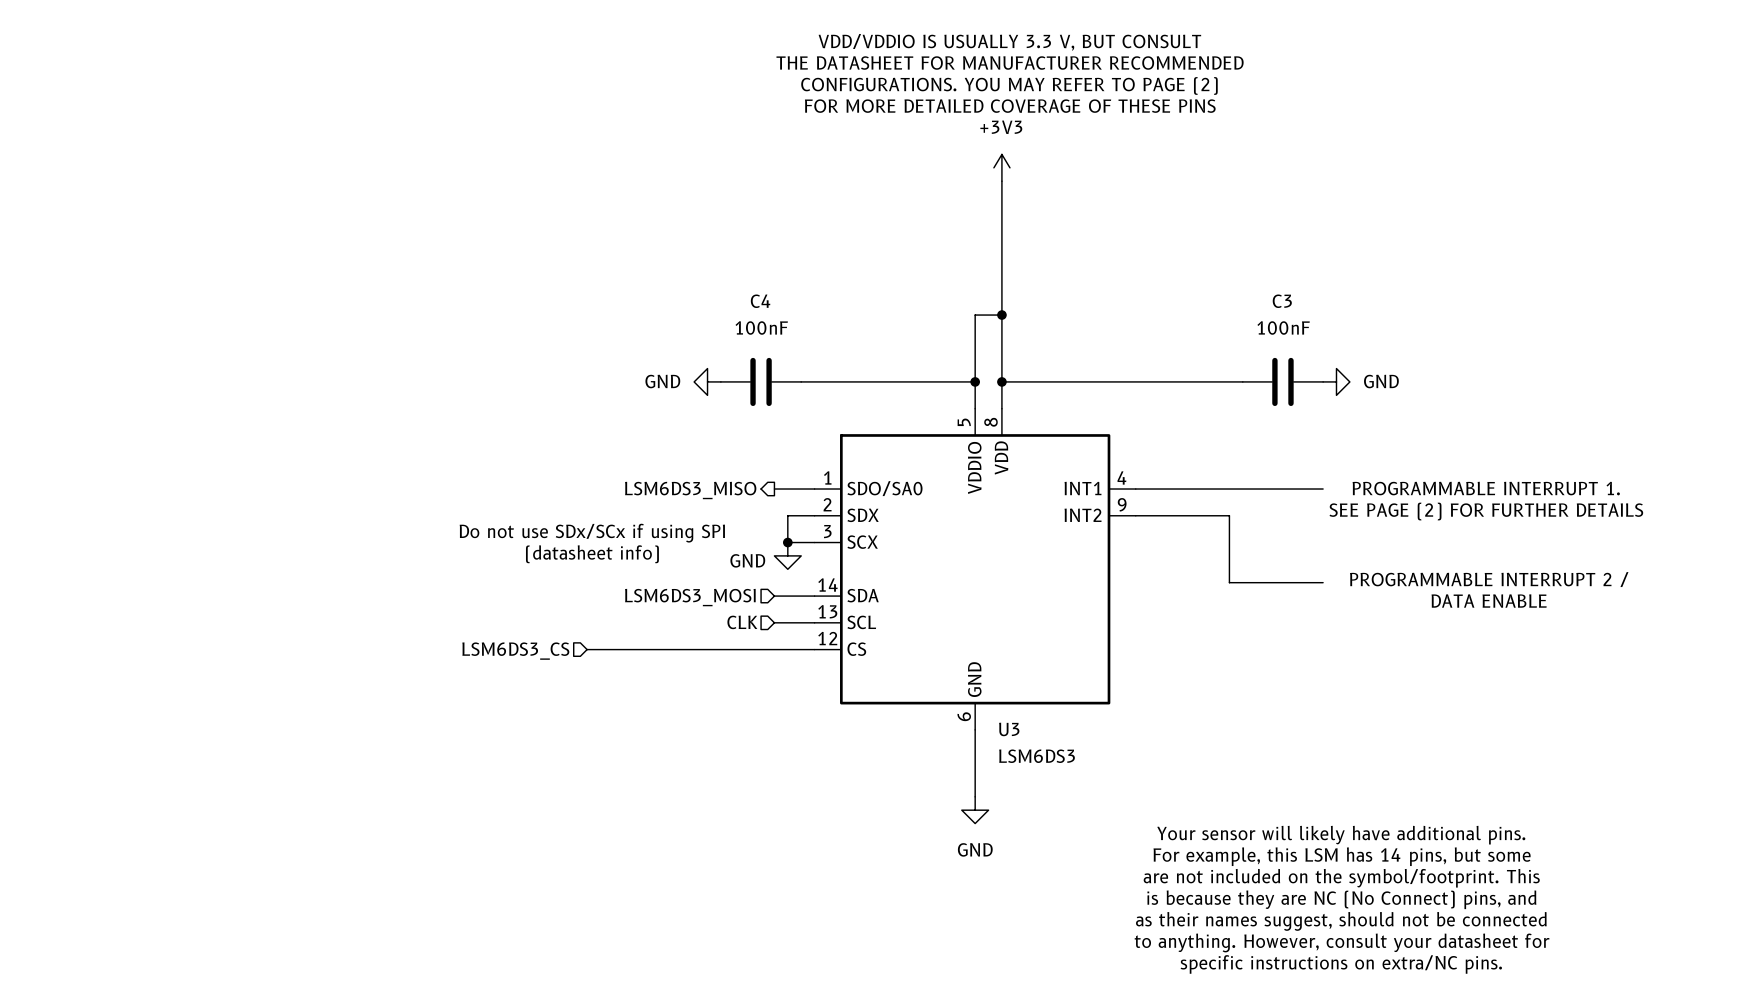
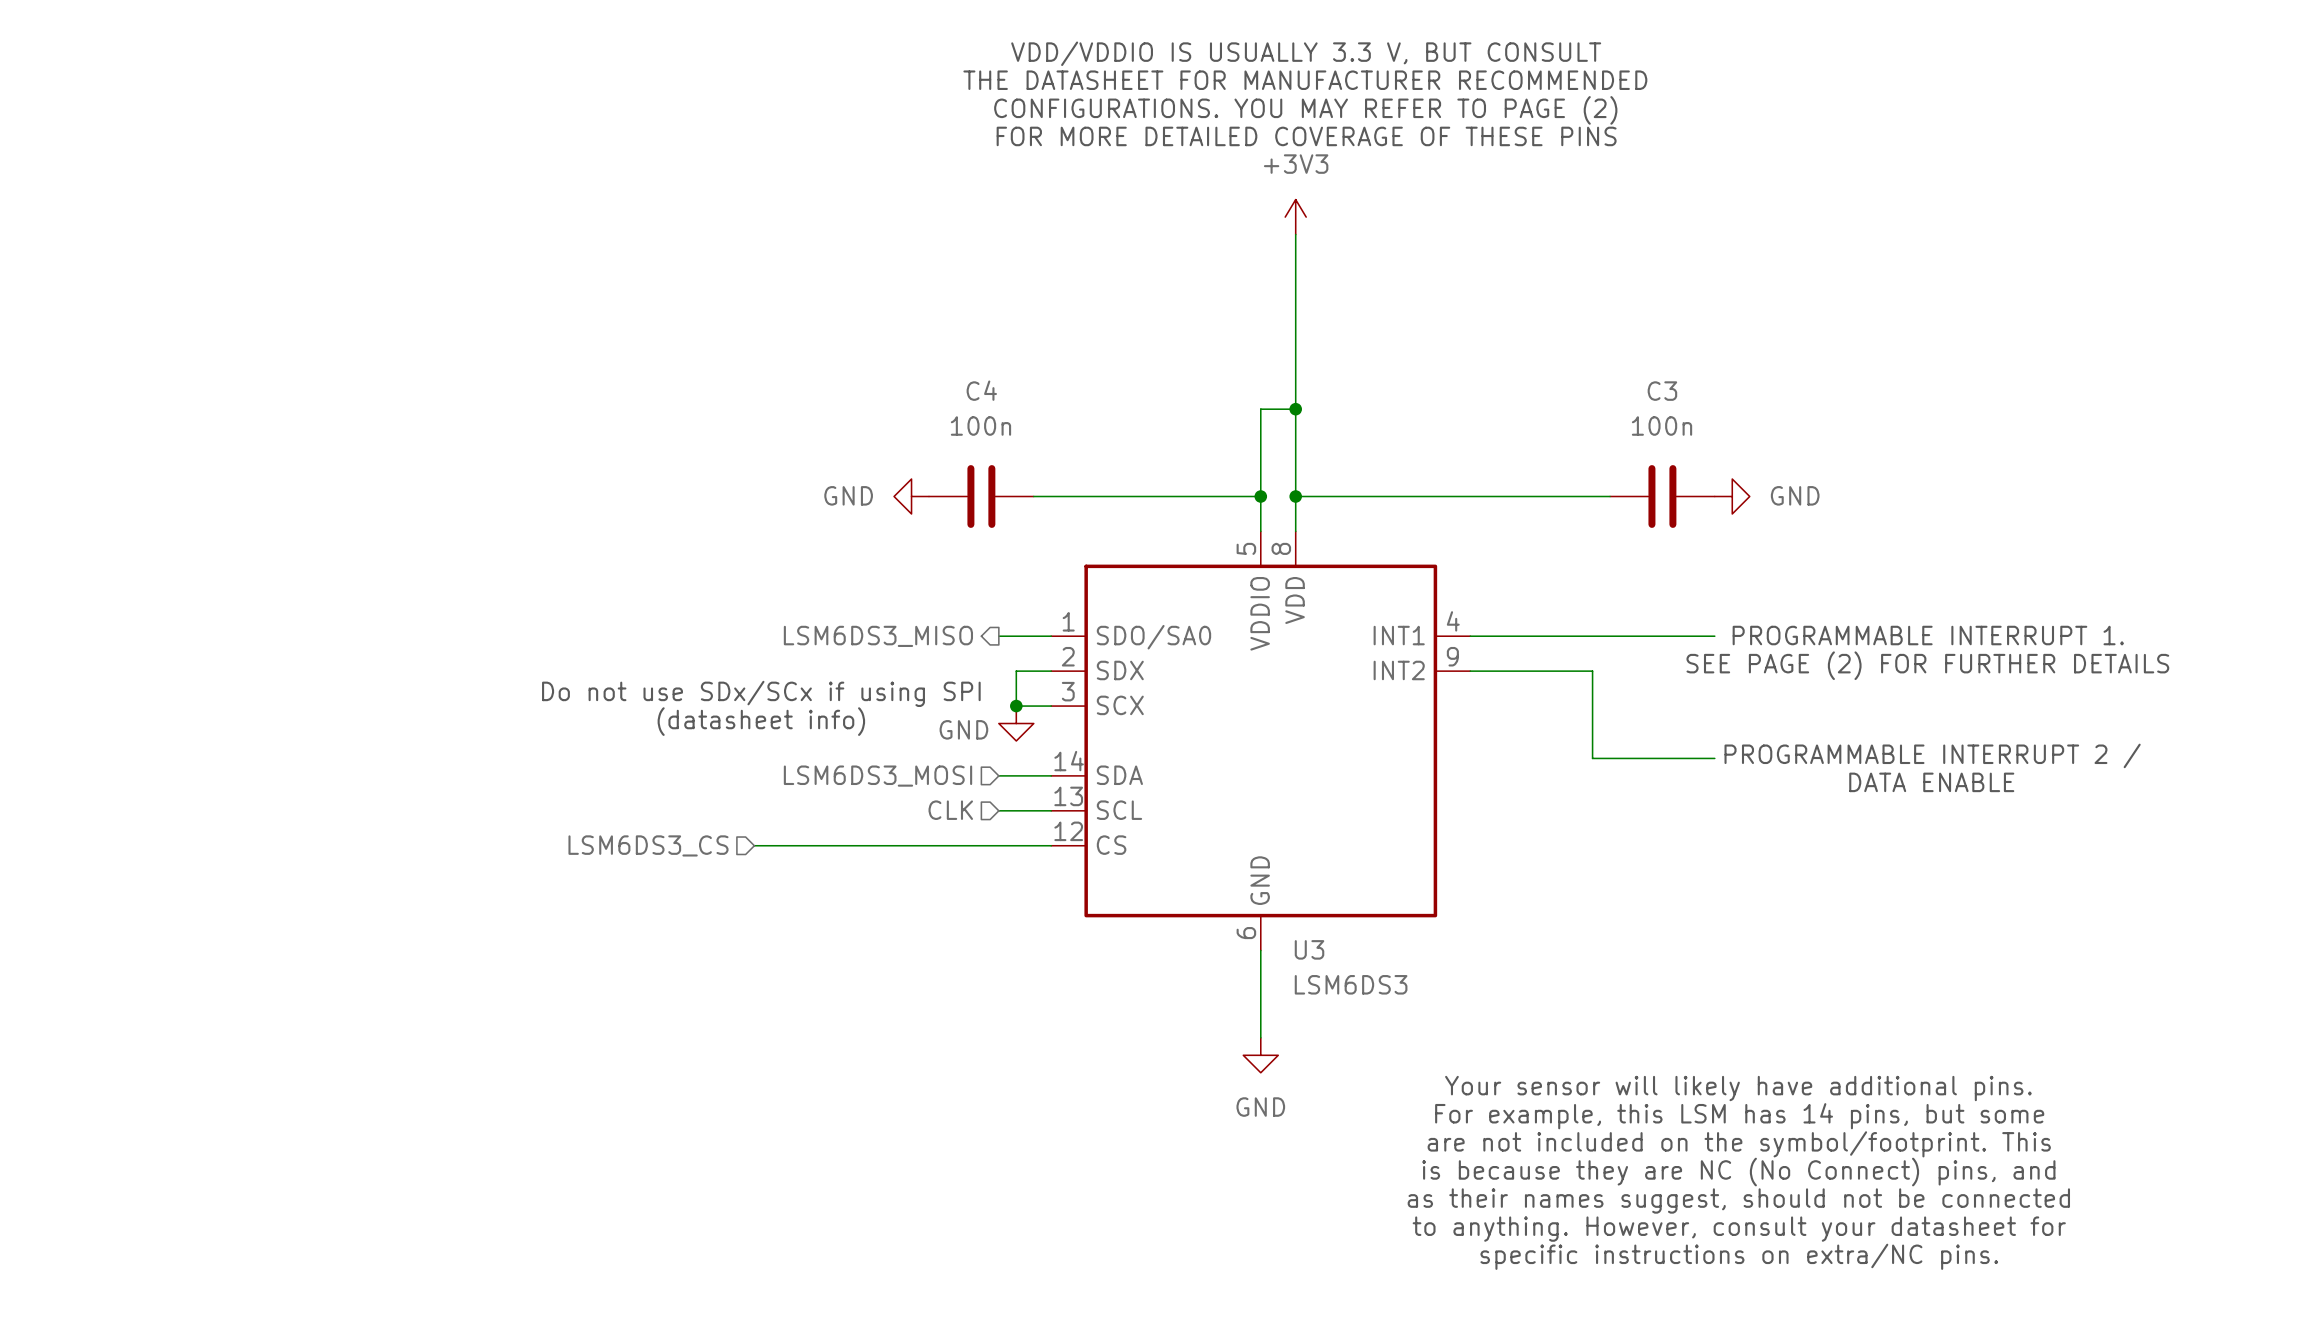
C4 value: 100nF (761, 327) -> 100n (980, 426)
C3 value: 100nF (1283, 327) -> 100n (1662, 426)

